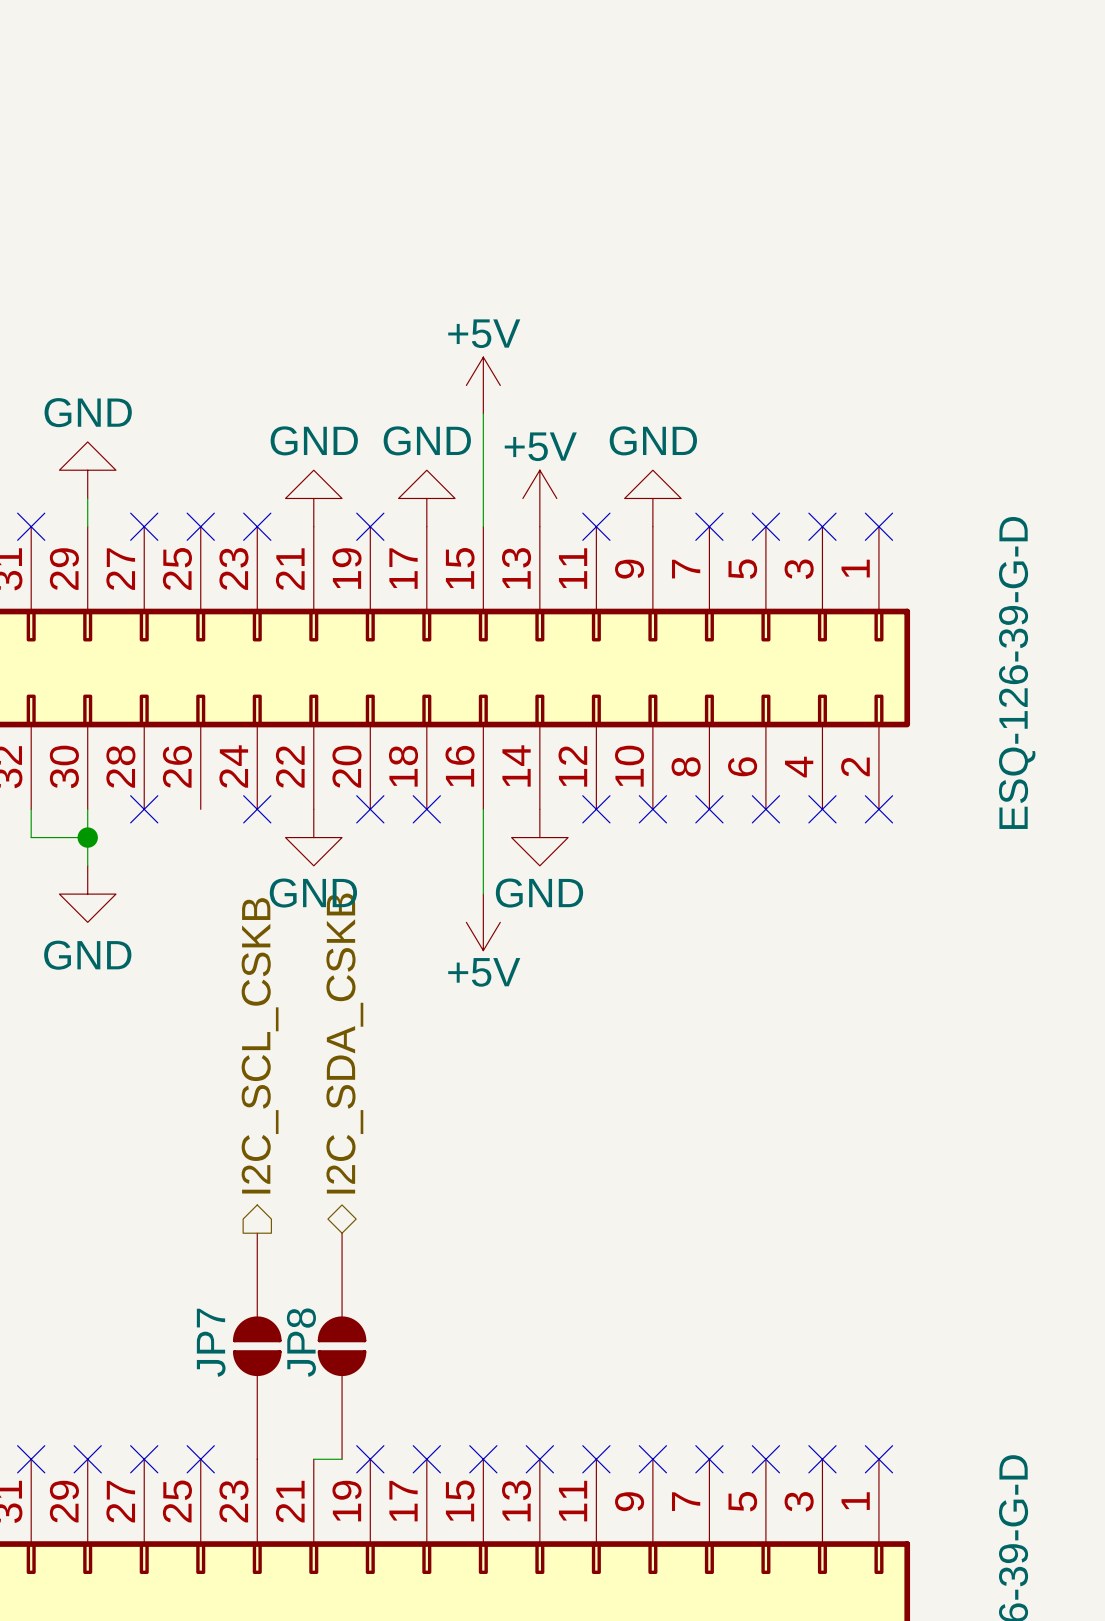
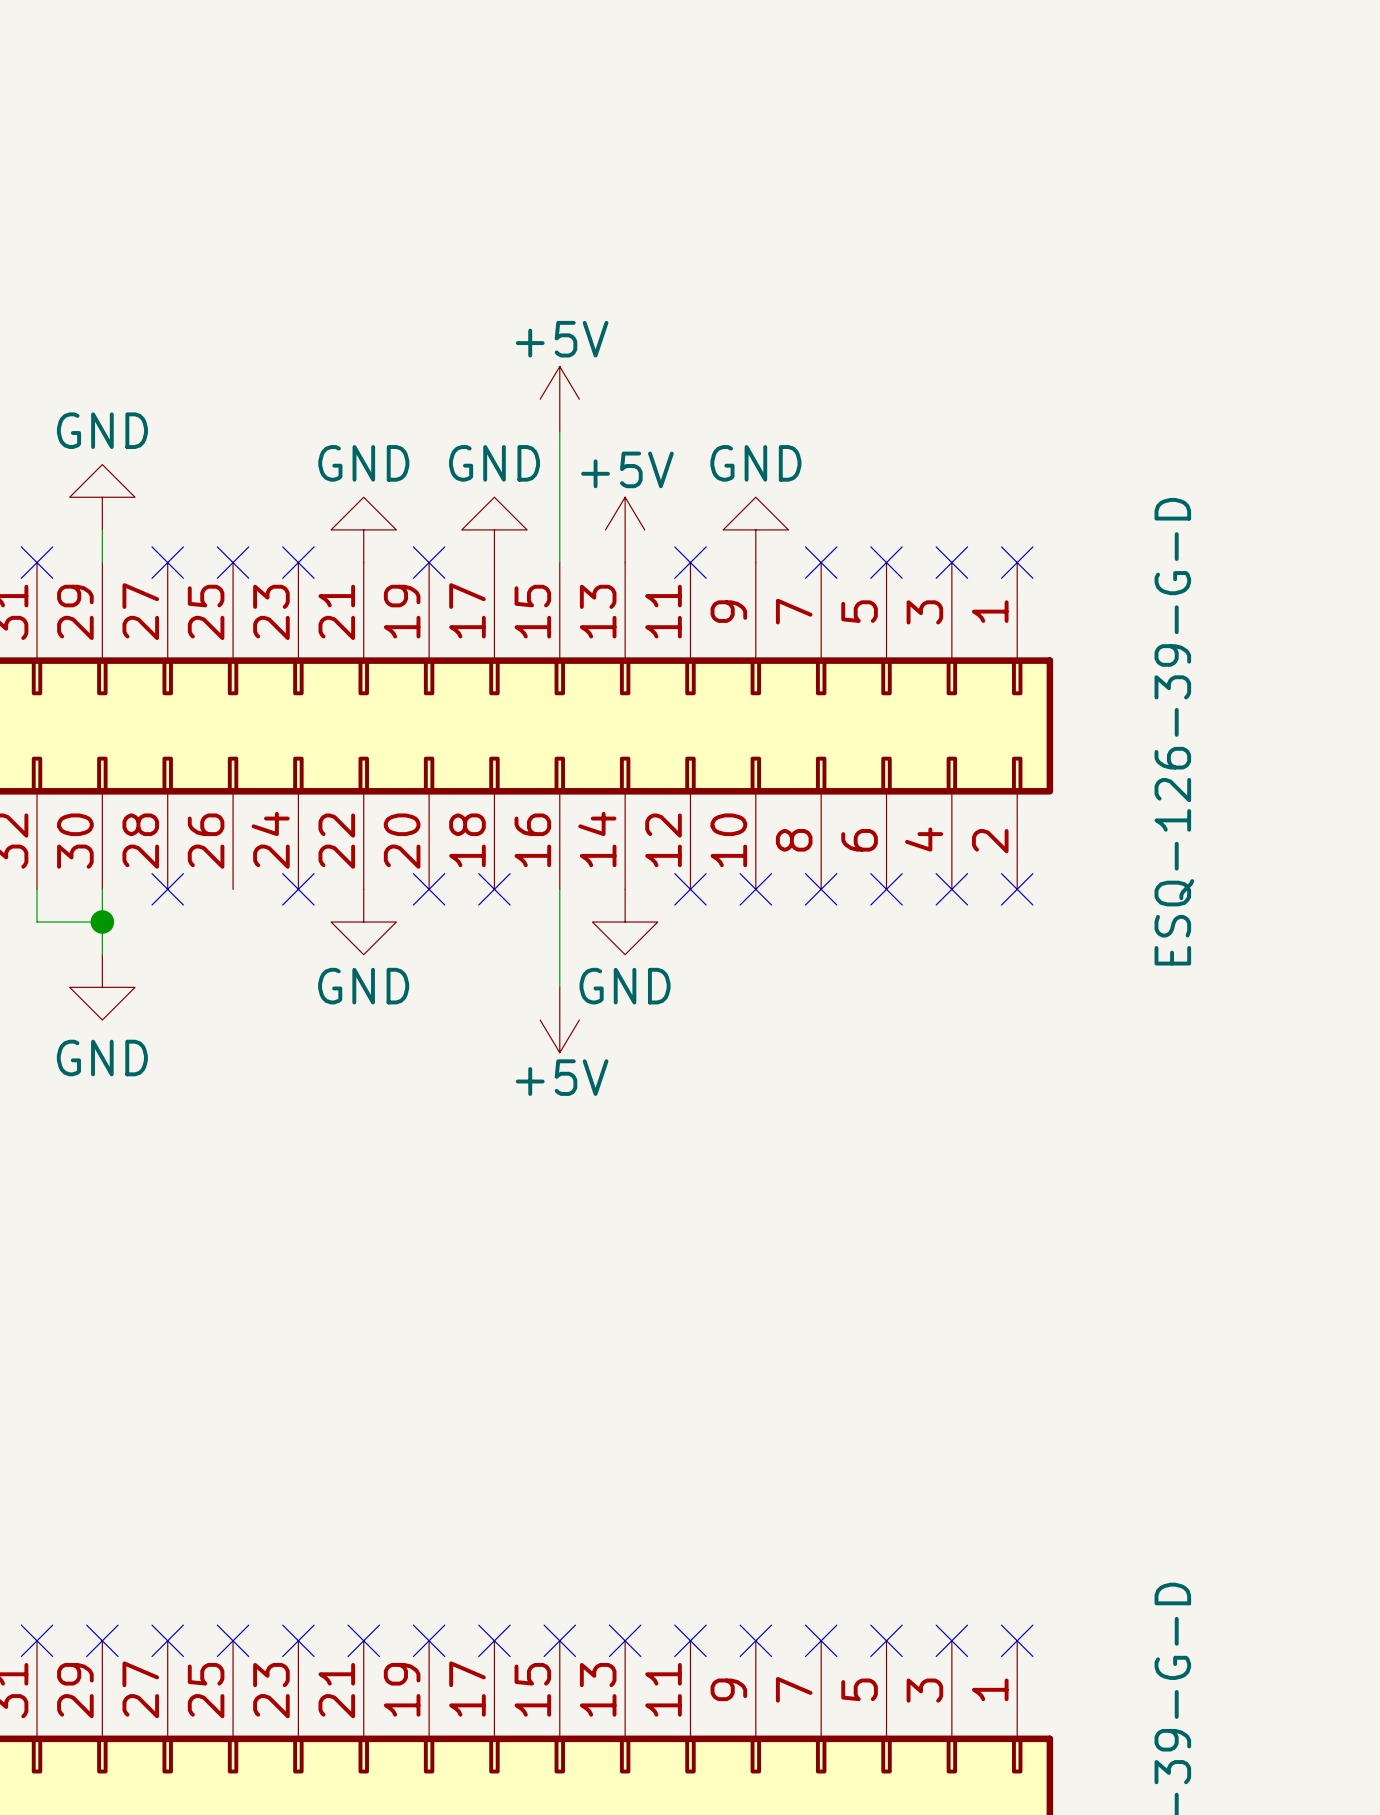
hierarchical label: I2C_SDA_CSKB (344, 1043) -> none
hierarchical label: I2C_SCL_CSKB (260, 1045) -> none
JP7: (257, 1346) -> none
JP8: (342, 1346) -> none
no-connect mark: none -> (298, 1640)
wire: (313, 1459) (342, 1459) -> none
no-connect mark: none -> (363, 1640)

